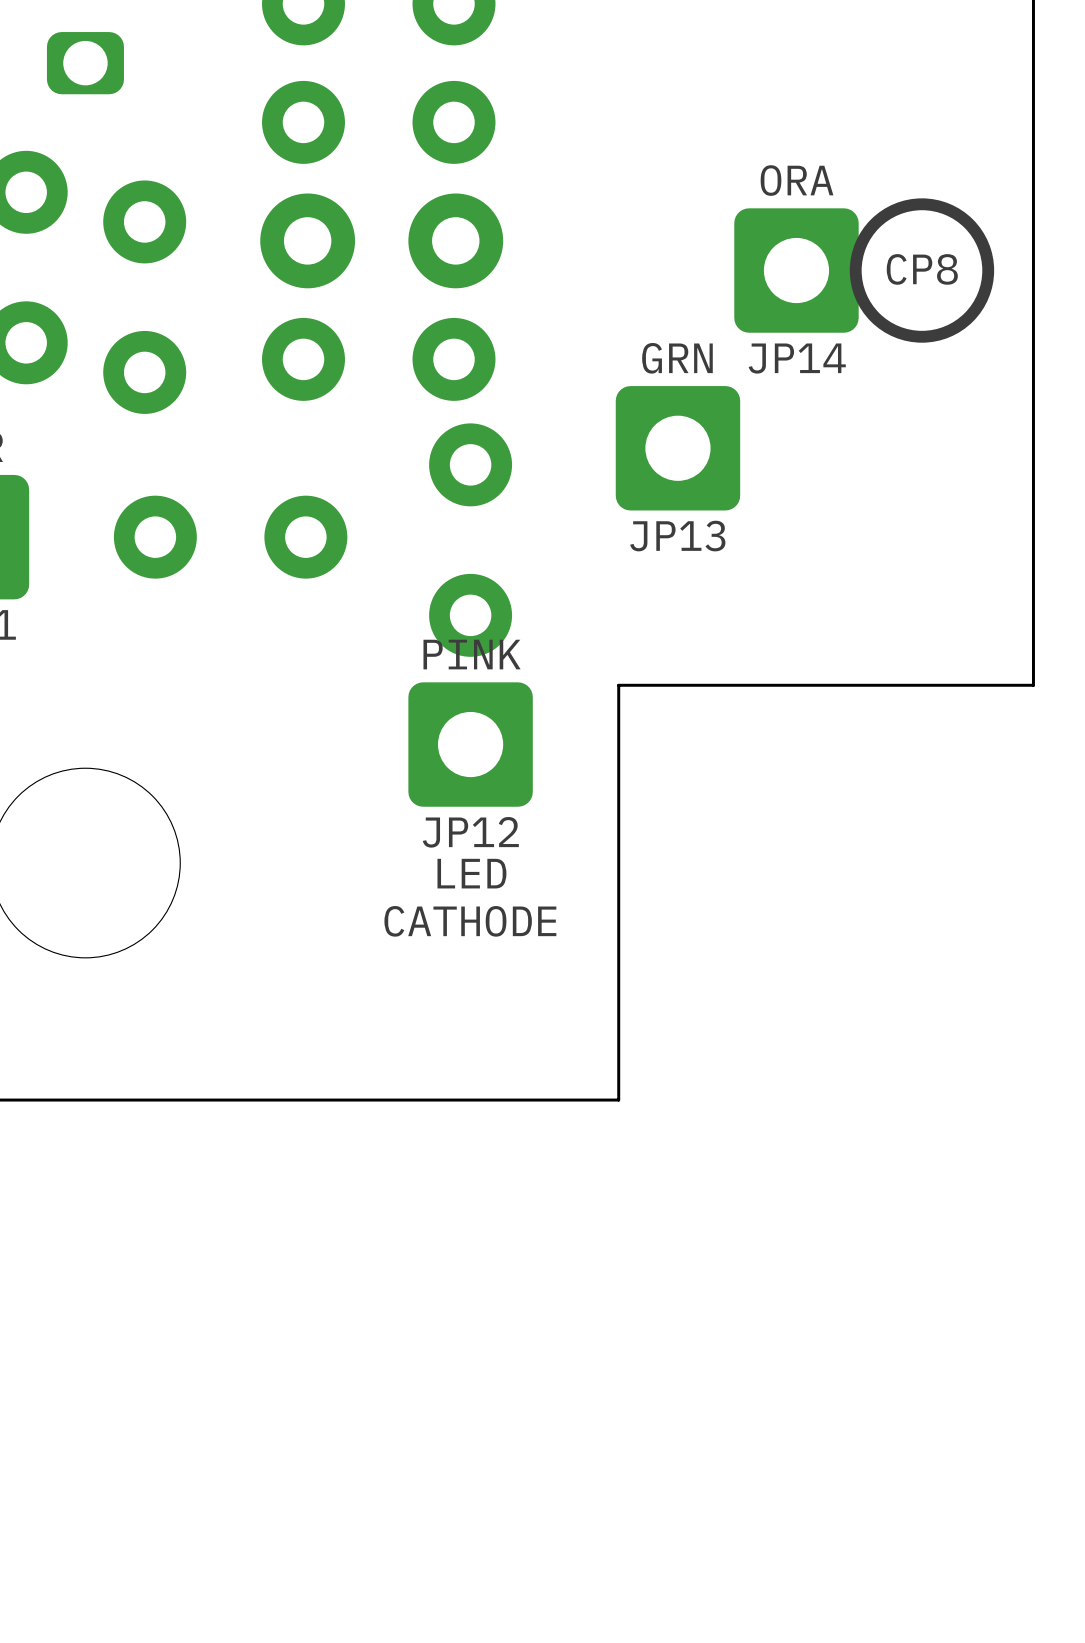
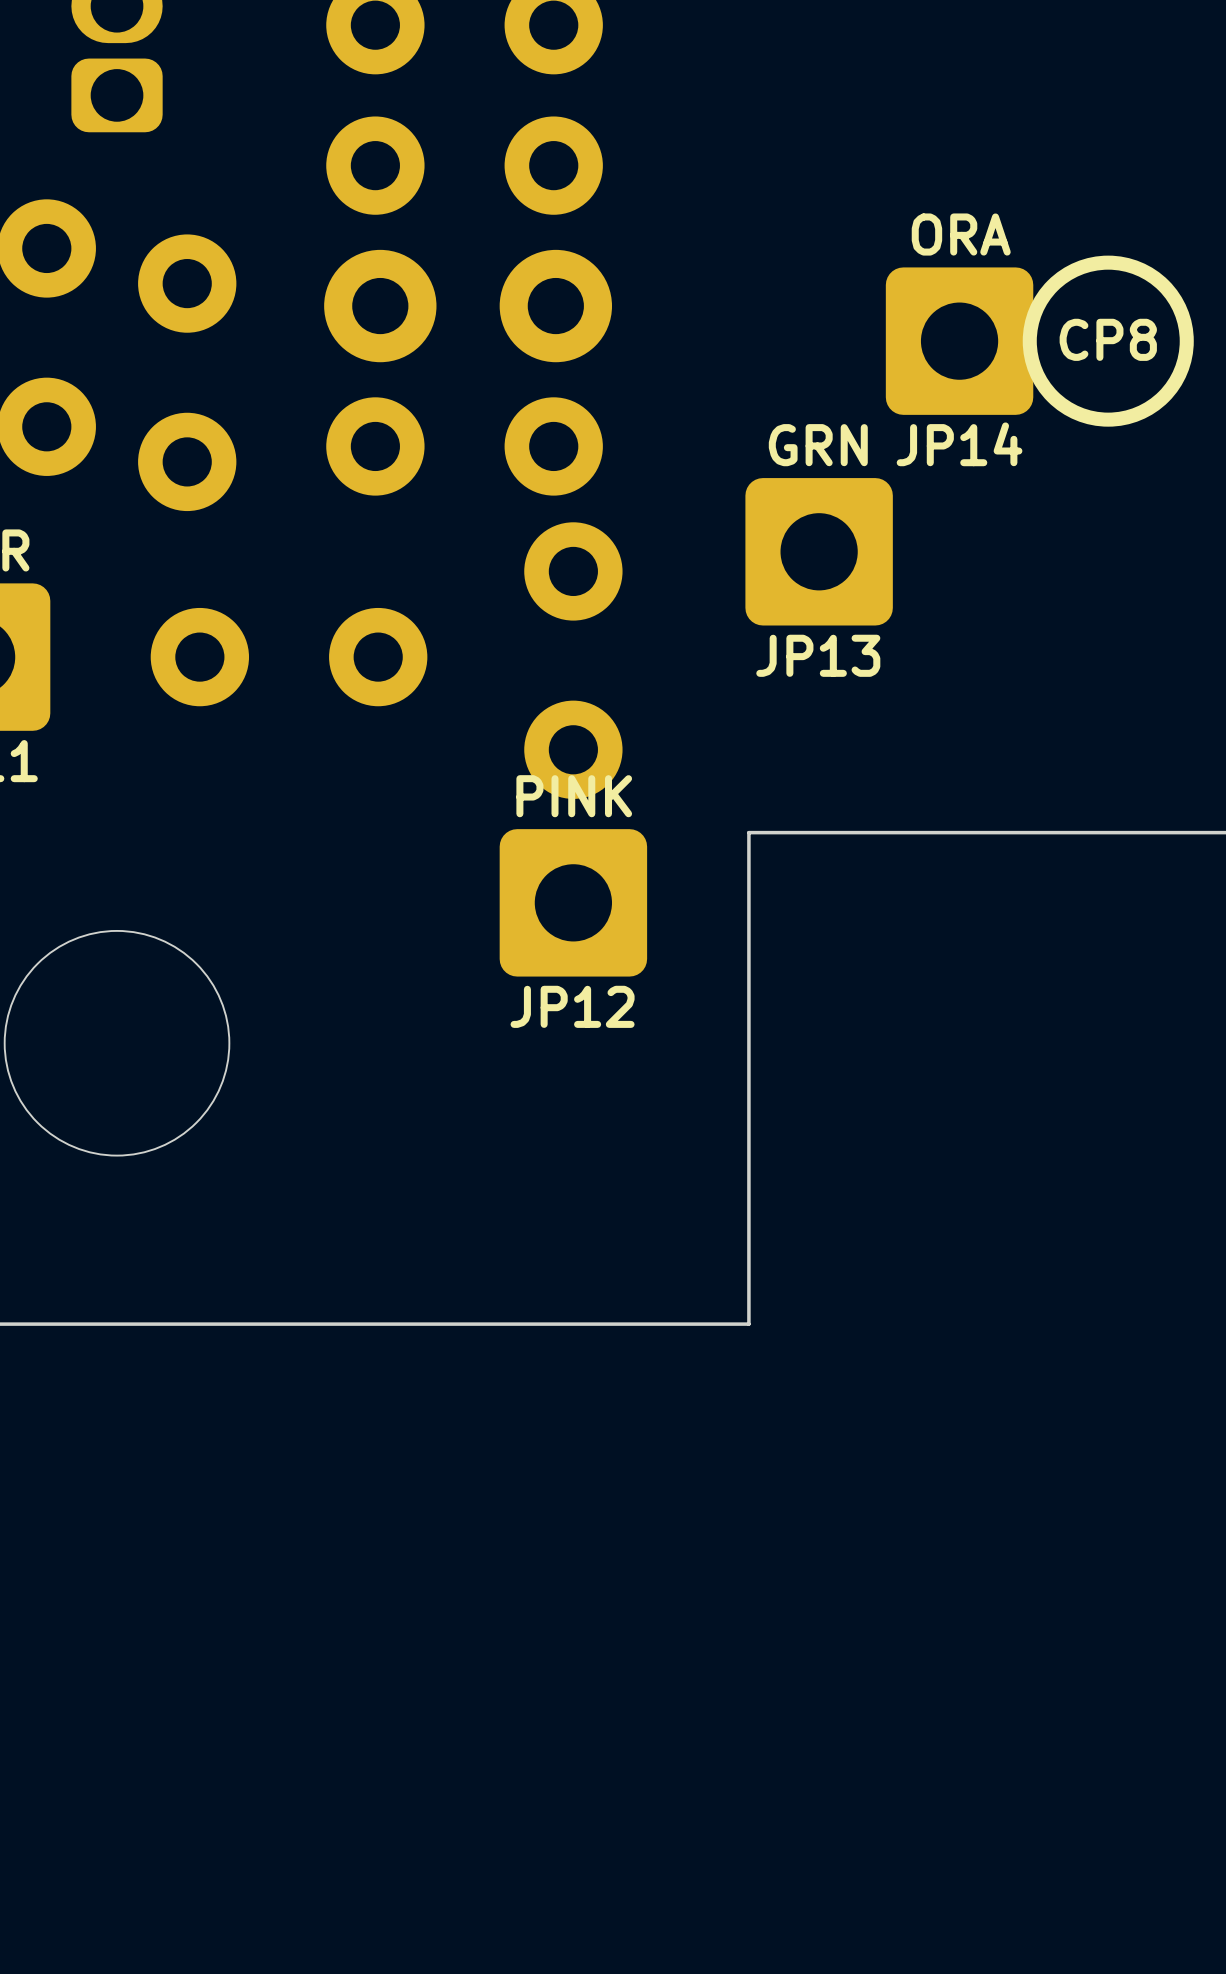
text: LED (471, 873) -> none
text: CATHODE (470, 921) -> none

